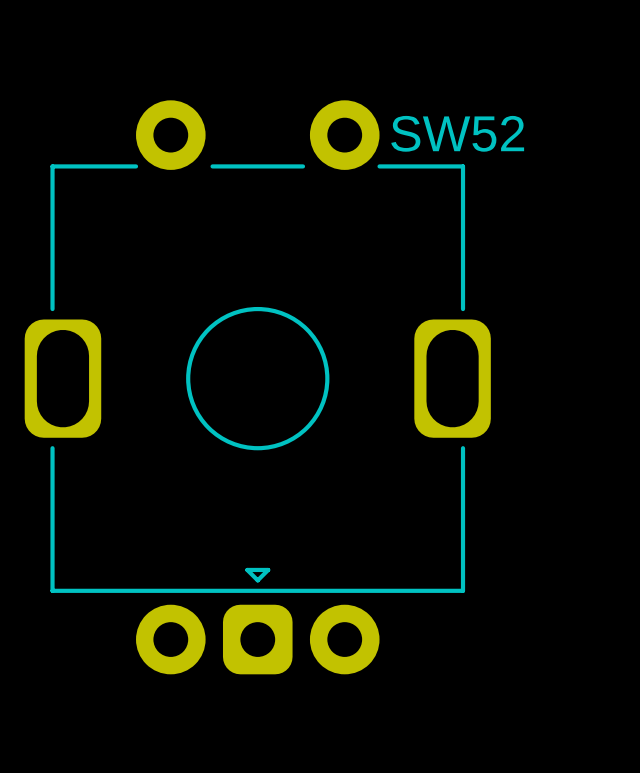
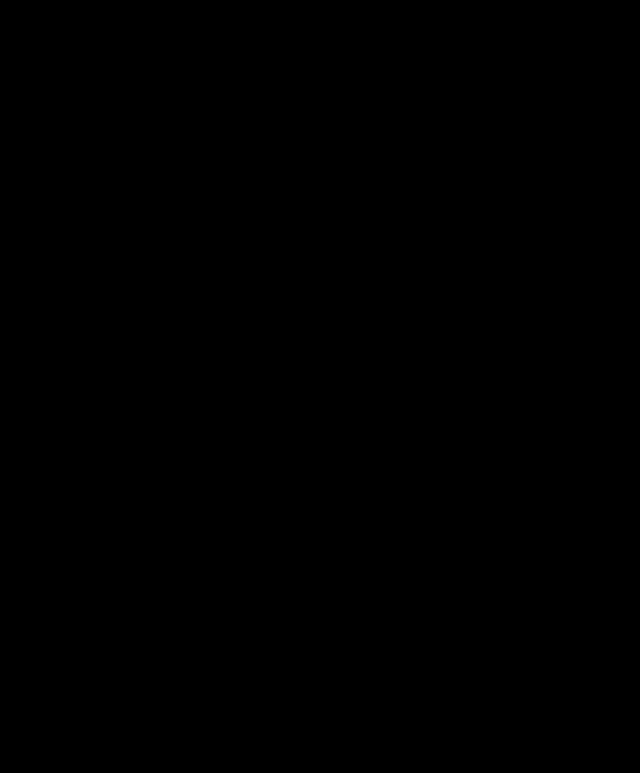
SW52: (257, 387) -> none

